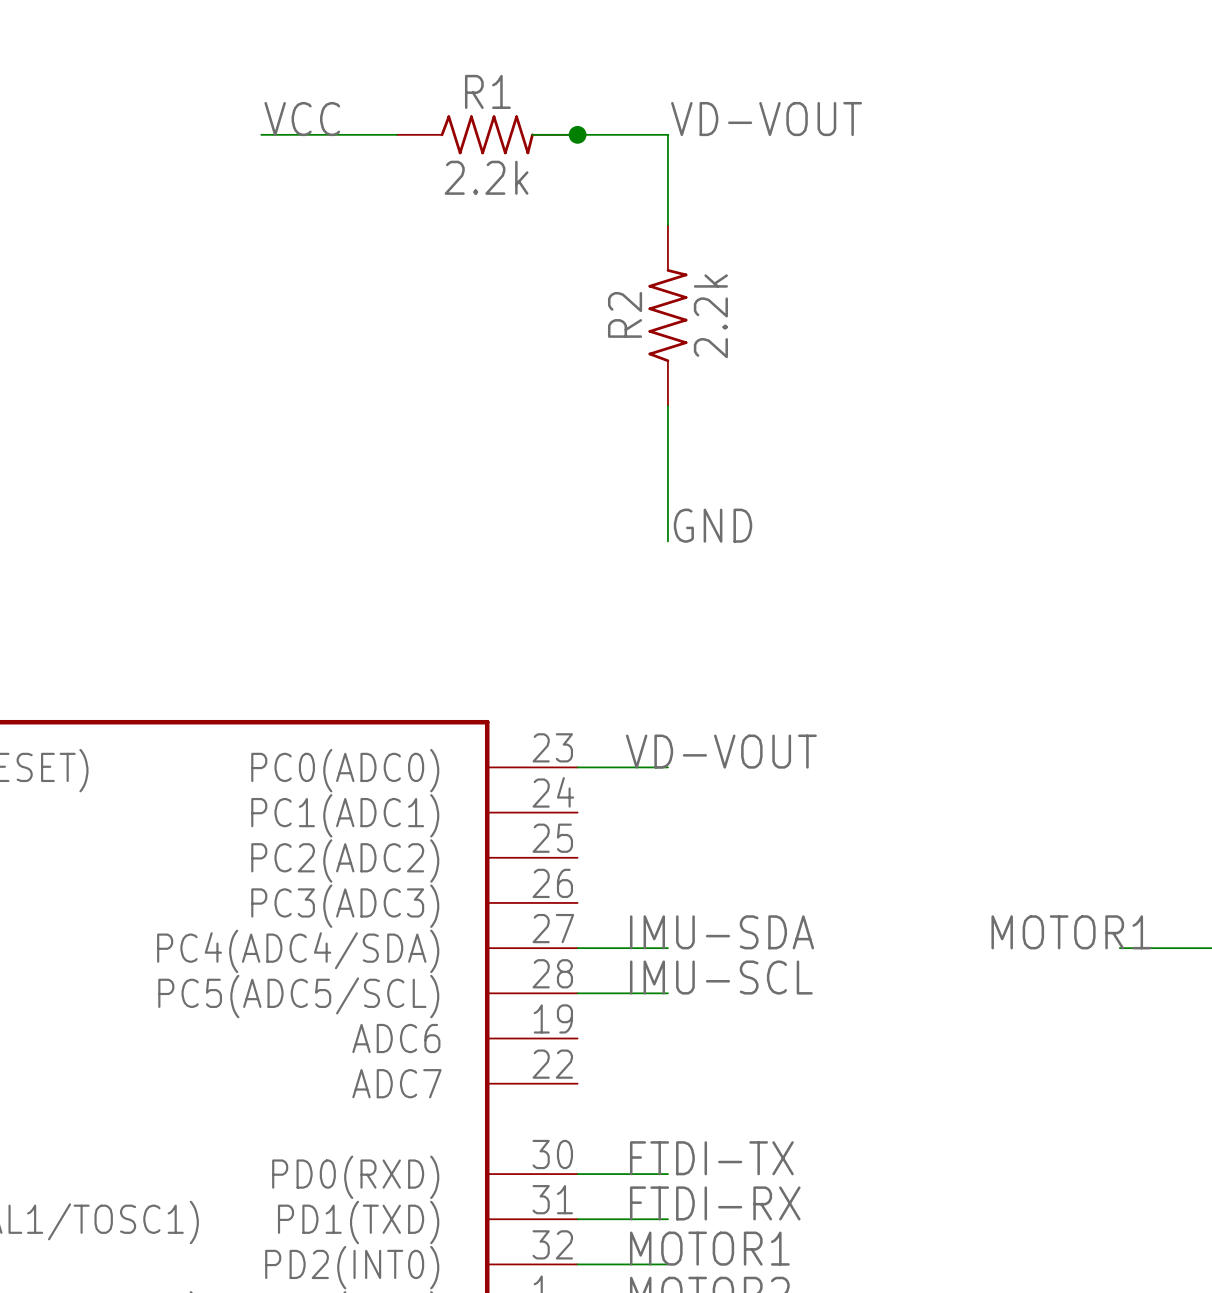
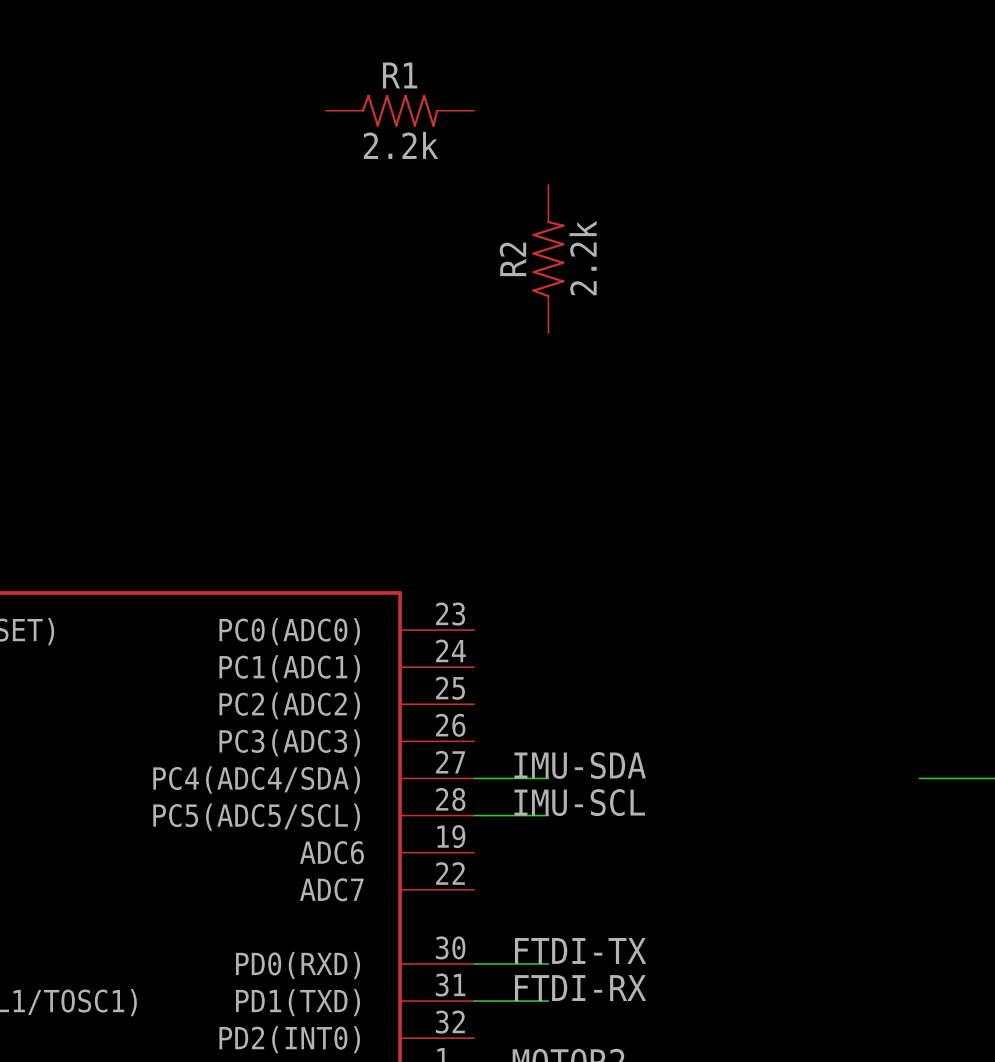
label: VCC (302, 119) -> none
label: VD-VOUT (766, 119) -> none
wire: (261, 134) (396, 134) -> none
wire: (532, 134) (667, 134) (667, 225) -> none
junction: (577, 134) -> none
wire: (667, 405) (667, 541) -> none
label: GND (713, 525) -> none
label: VD-VOUT (721, 751) -> none
wire: (577, 767) (667, 767) -> none
label: MOTOR1 (1071, 932) -> none
label: MOTOR1 (709, 1248) -> none
wire: (577, 1264) (667, 1264) -> none

